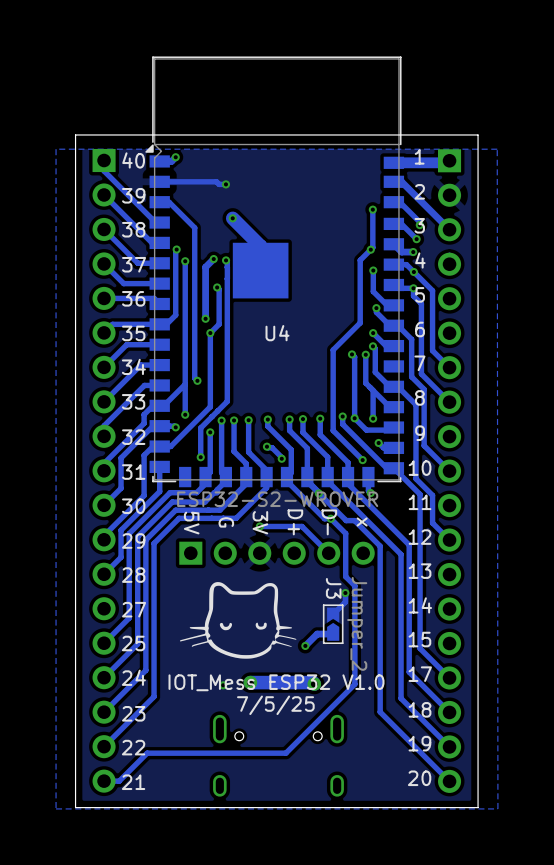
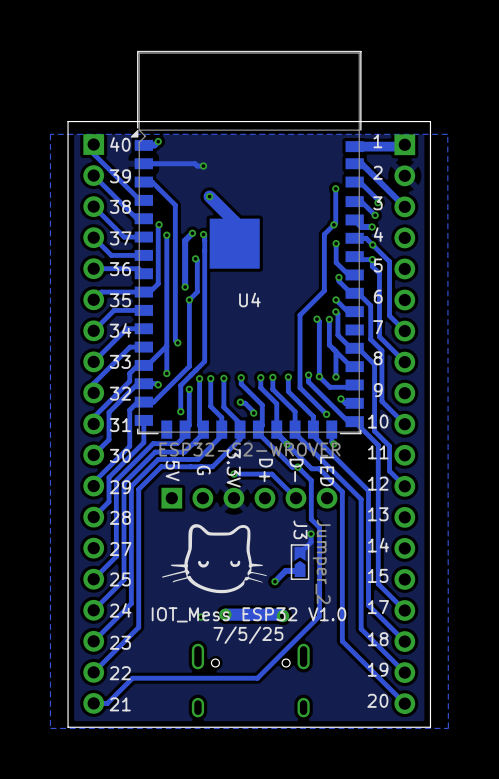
text: 3V (260, 522) -> 3.3V (233, 468)
text: x (362, 522) -> LED (327, 471)

